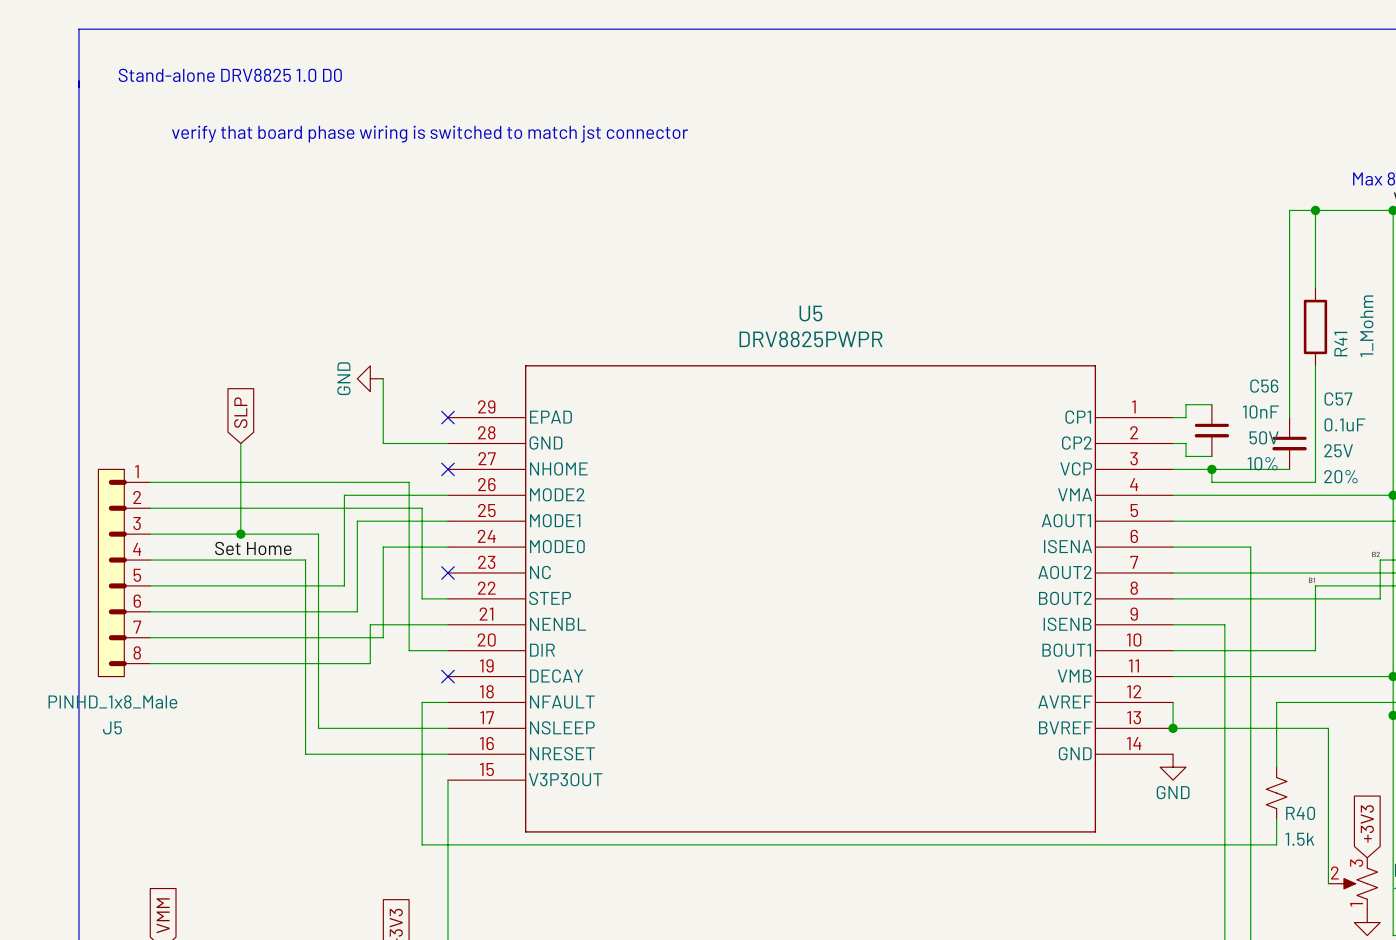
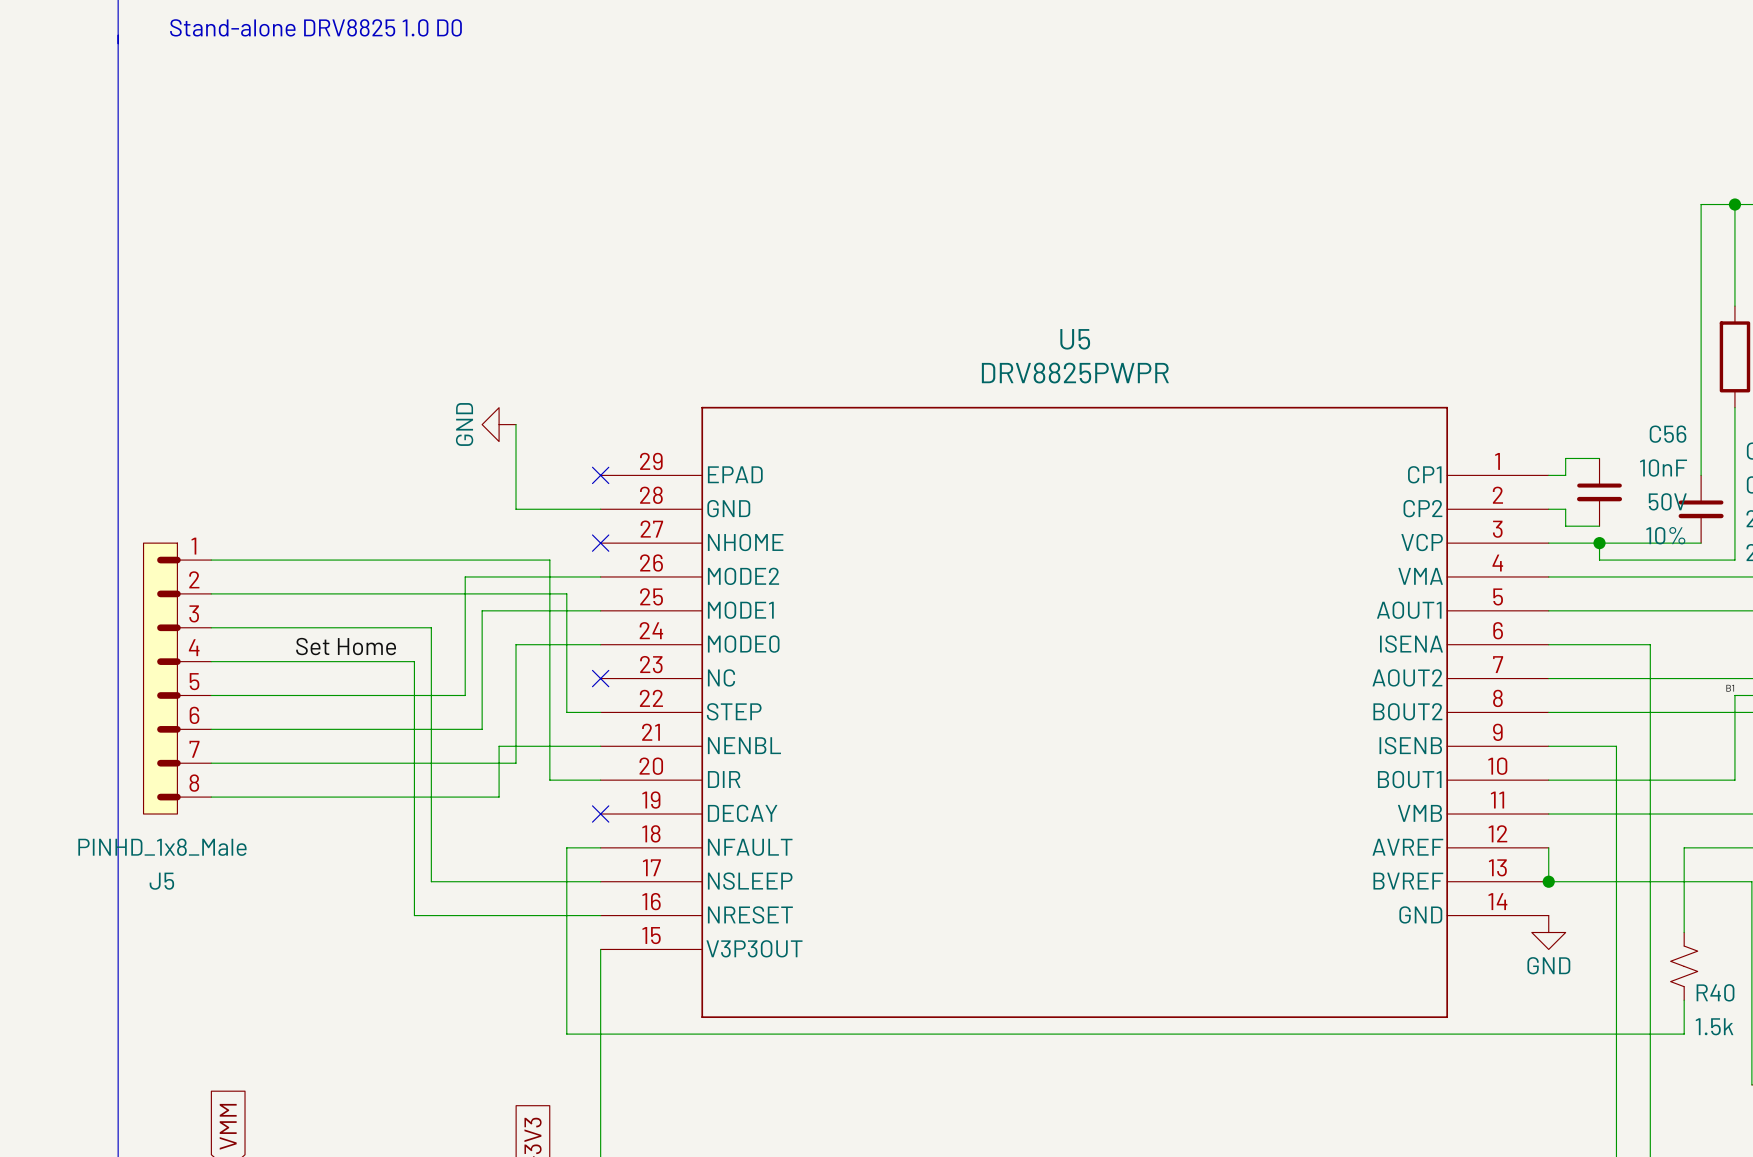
text: verify that board phase wiring is switched to match jst connector (430, 134) -> none
global label: SLP (240, 412) -> none
wire: (240, 443) (240, 534) -> none
junction: (240, 534) -> none

